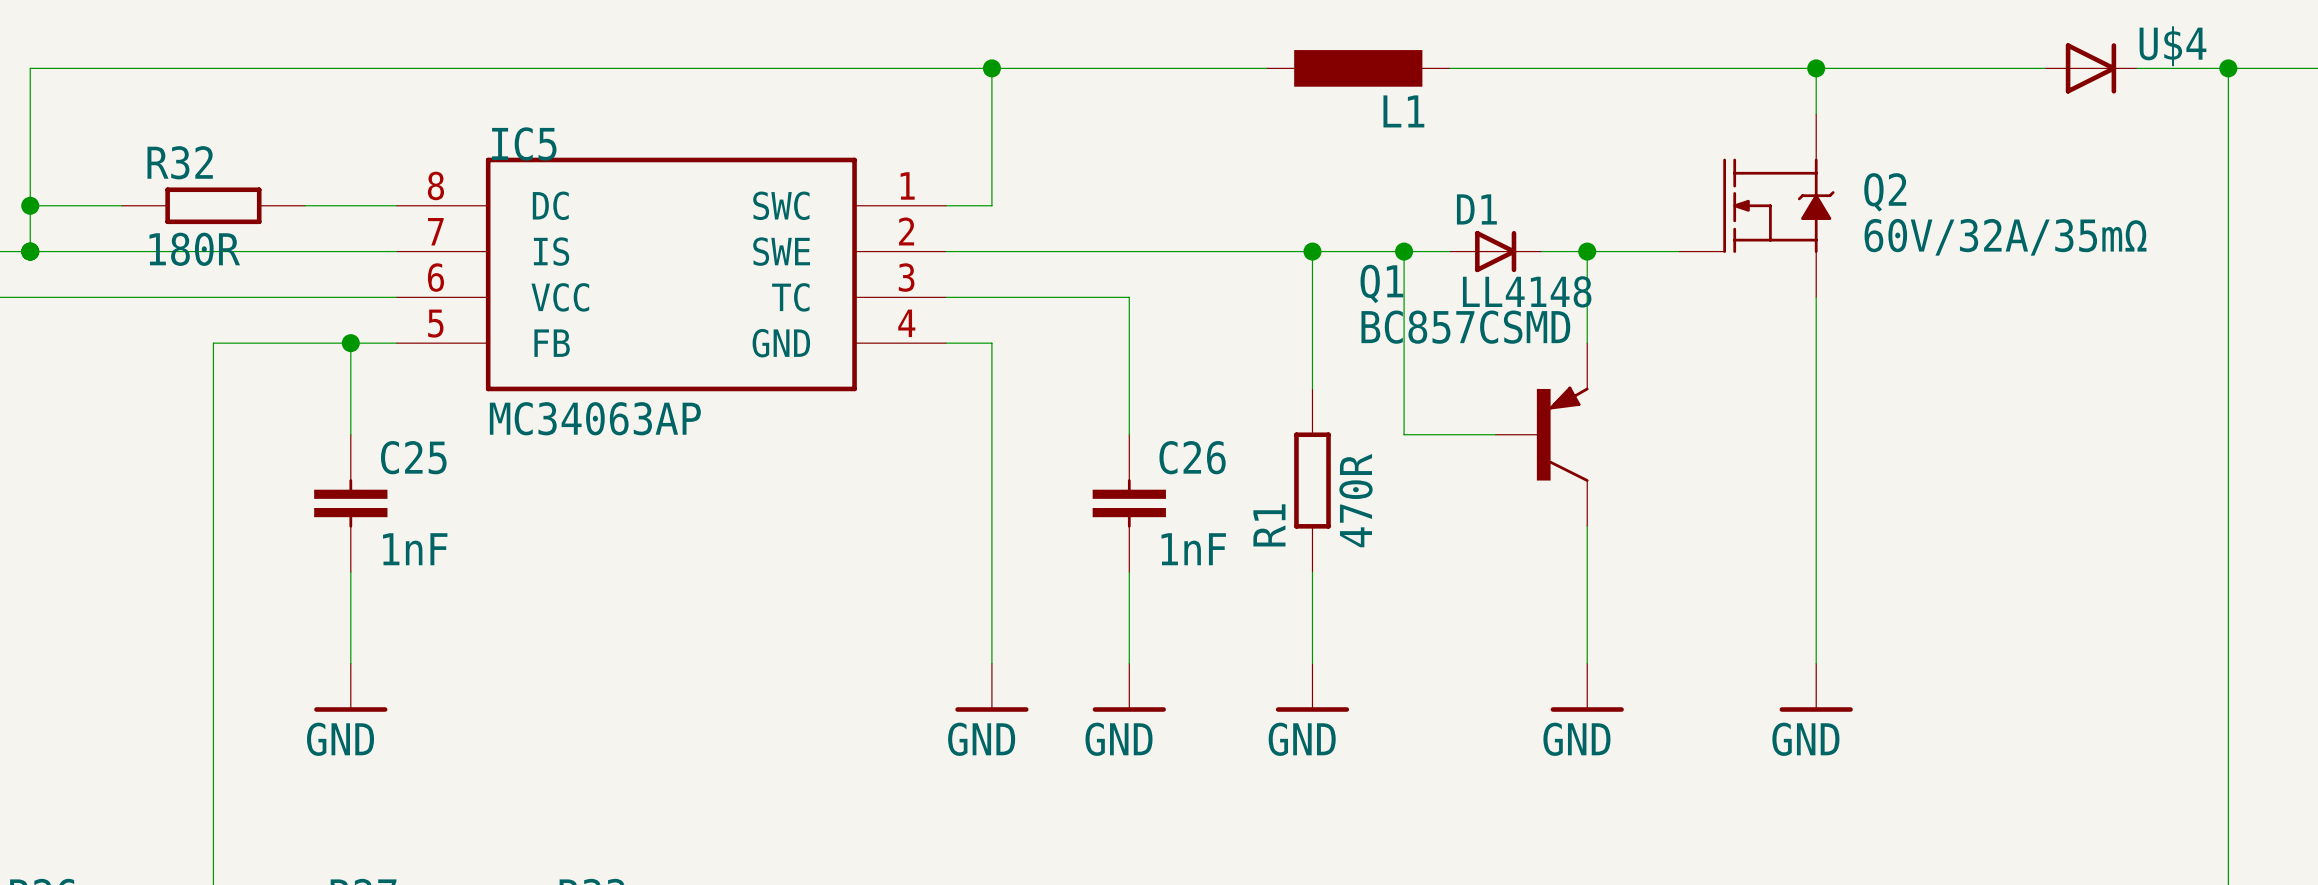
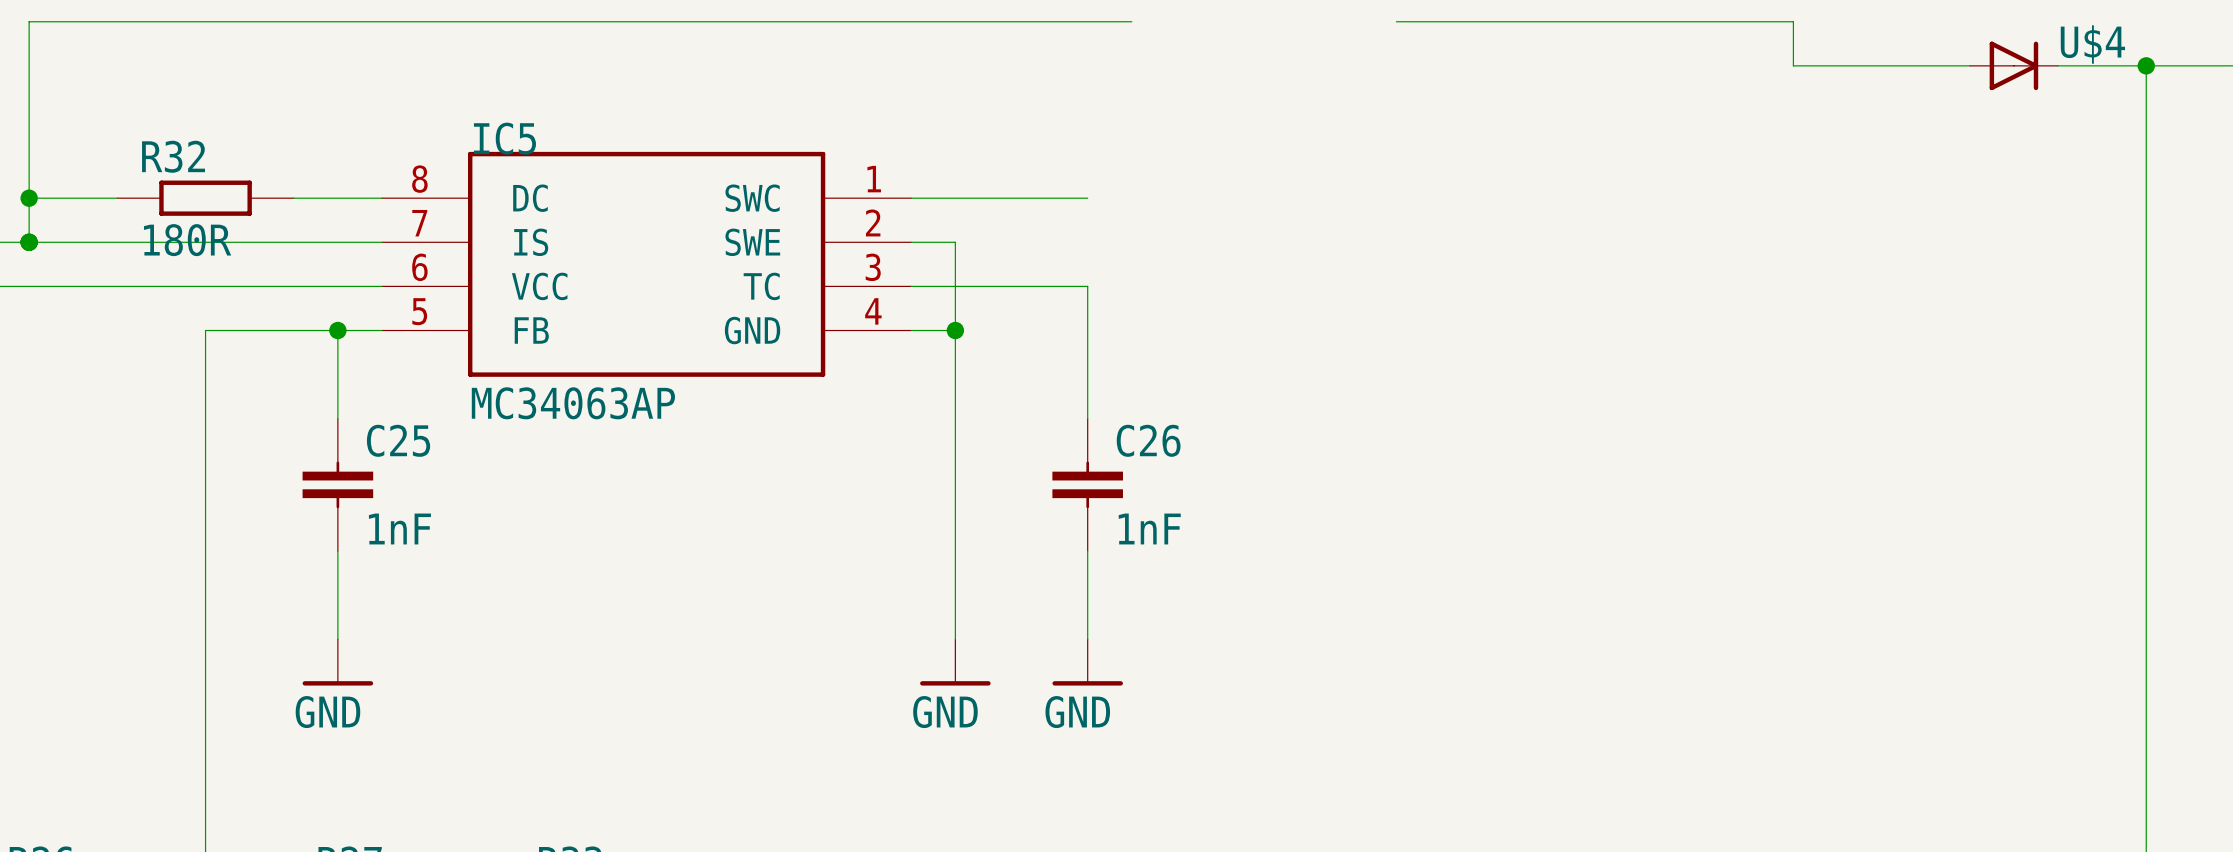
wire: (30, 68) (1266, 68) -> (29, 65) (29, 21) (1131, 21)
wire: (991, 68) (991, 205) -> (1087, 198) (955, 198)
junction: (991, 68) -> none
L1: (1358, 68) -> none
wire: (1449, 68) (1862, 68) -> (1396, 21) (1793, 21) (1793, 65)
wire: (1816, 68) (1816, 114) -> none
junction: (1816, 68) -> none
Q2: 60V/32A/35mΩ (1756, 205) -> none
wire: (991, 251) (1449, 251) -> (955, 242) (955, 330)
wire: (1312, 251) (1312, 388) -> none
junction: (1312, 251) -> none
wire: (1404, 251) (1404, 434) (1495, 434) -> none
junction: (1404, 251) -> none
D1: LL4148 (1495, 251) -> none
wire: (1541, 251) (1678, 251) -> none
wire: (1587, 251) (1587, 343) -> none
junction: (1587, 251) -> none
wire: (1816, 297) (1816, 663) -> none
junction: none -> (955, 330)
Q1: BC857CSMD (1542, 434) -> none
R1: 470R (1312, 480) -> none
wire: (1587, 526) (1587, 663) -> none
wire: (1312, 572) (1312, 663) -> none
power symbol: GND (1312, 687) -> none
power symbol: GND (1587, 687) -> none
power symbol: GND (1816, 687) -> none

